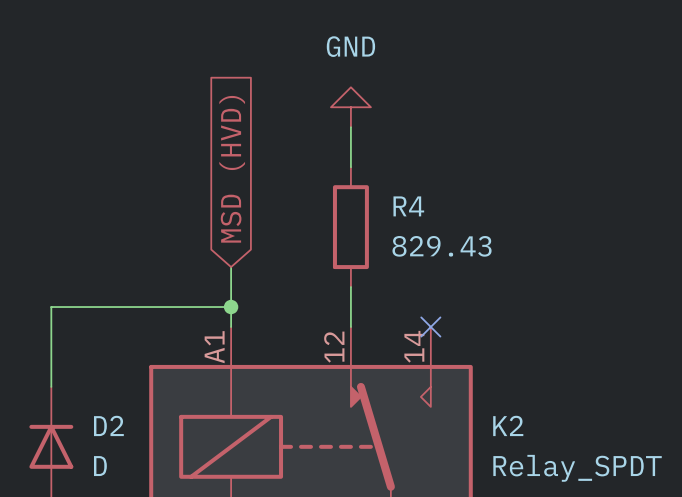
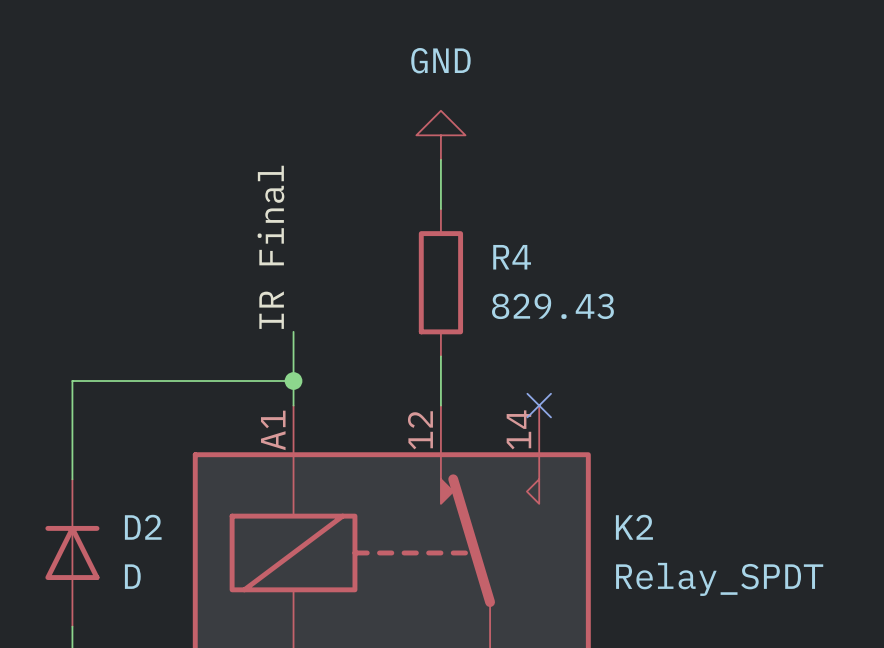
global label: MSD (HVD) (232, 169) -> none
label: none -> IR Final (270, 247)

